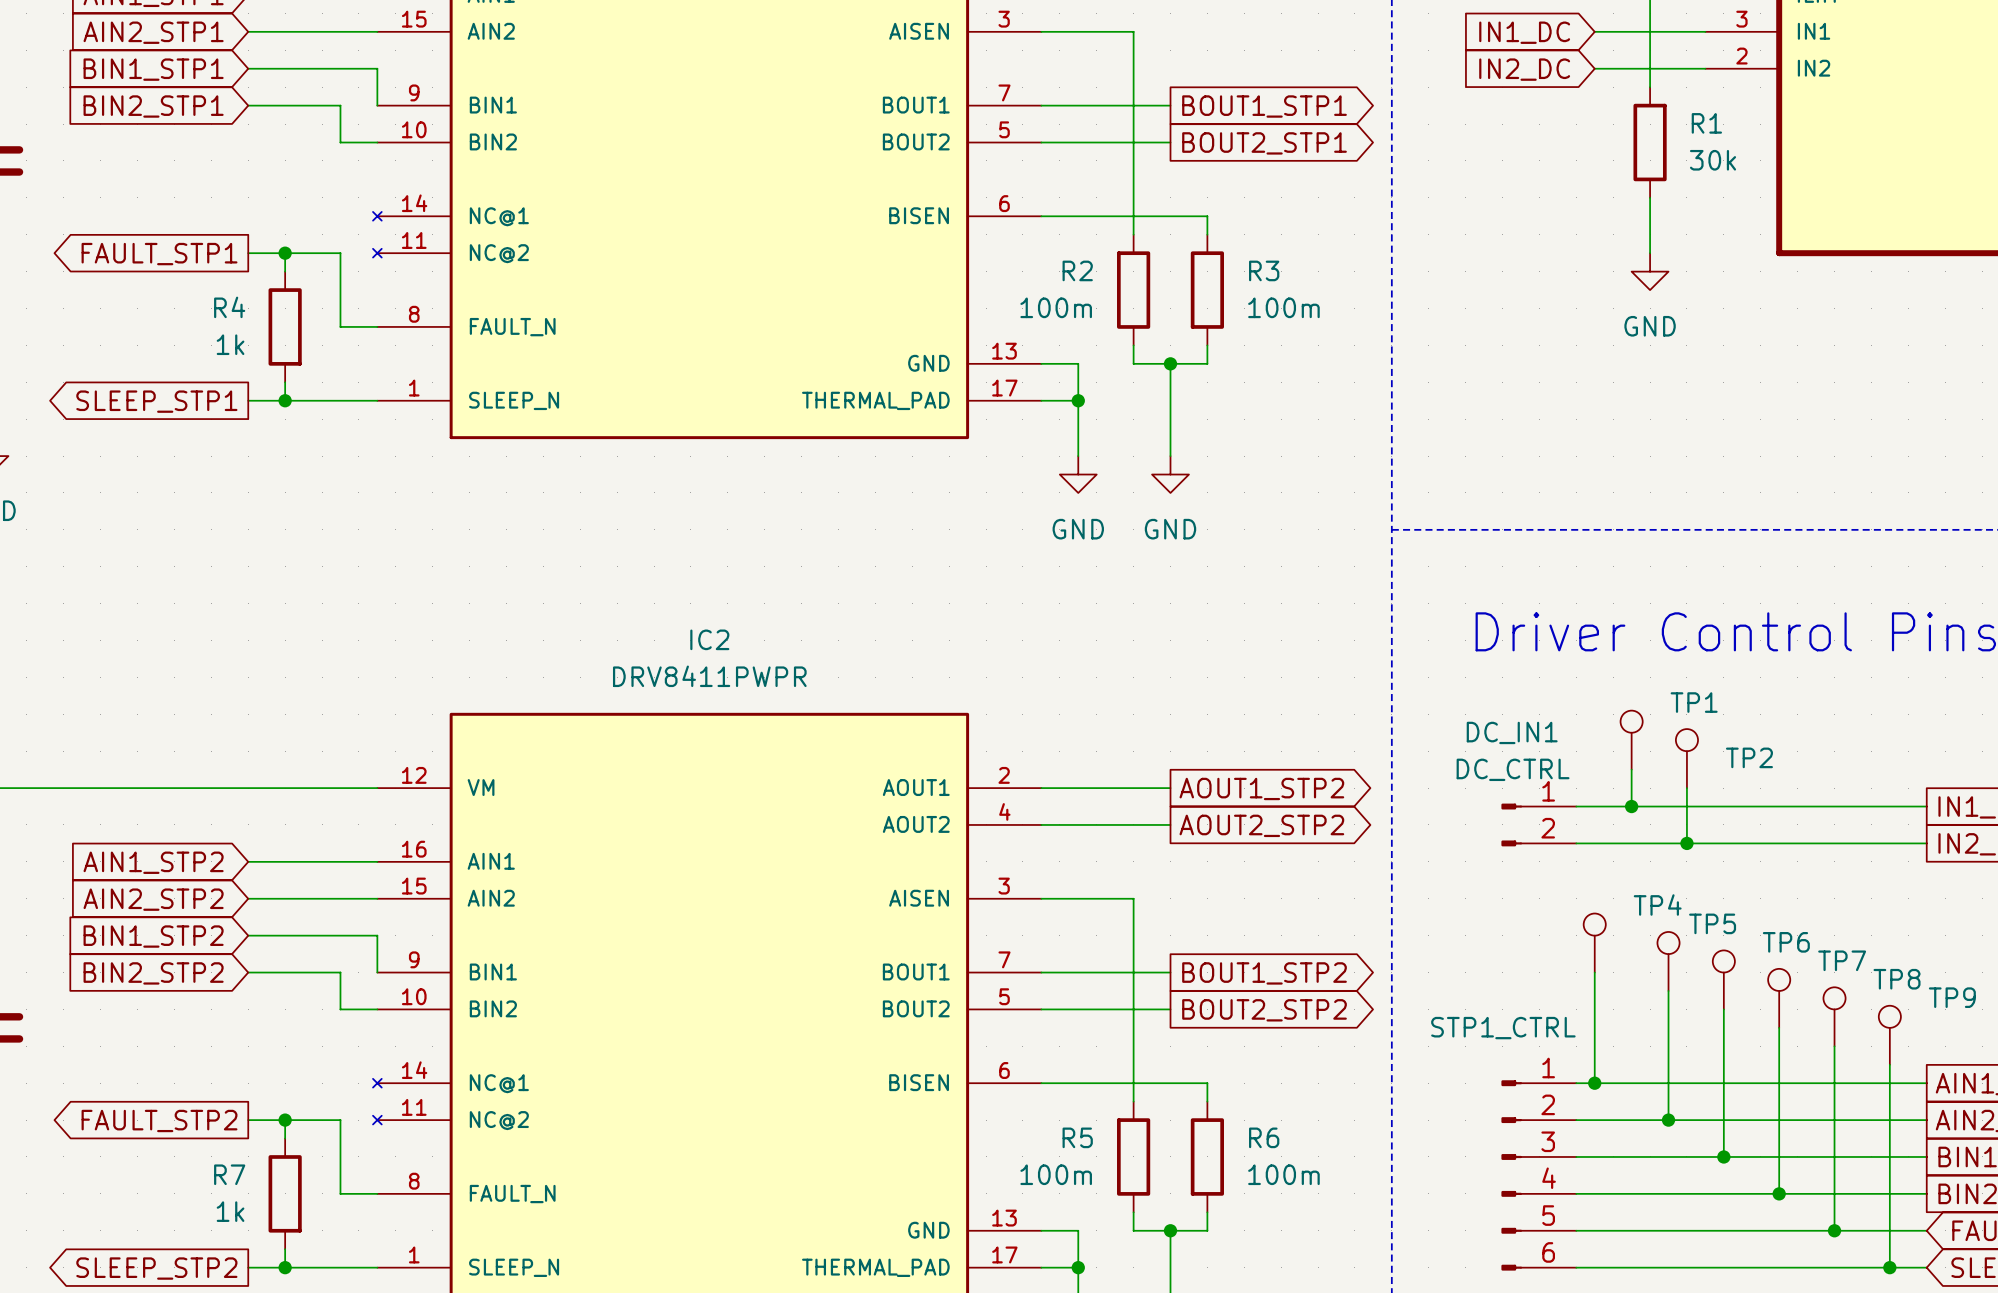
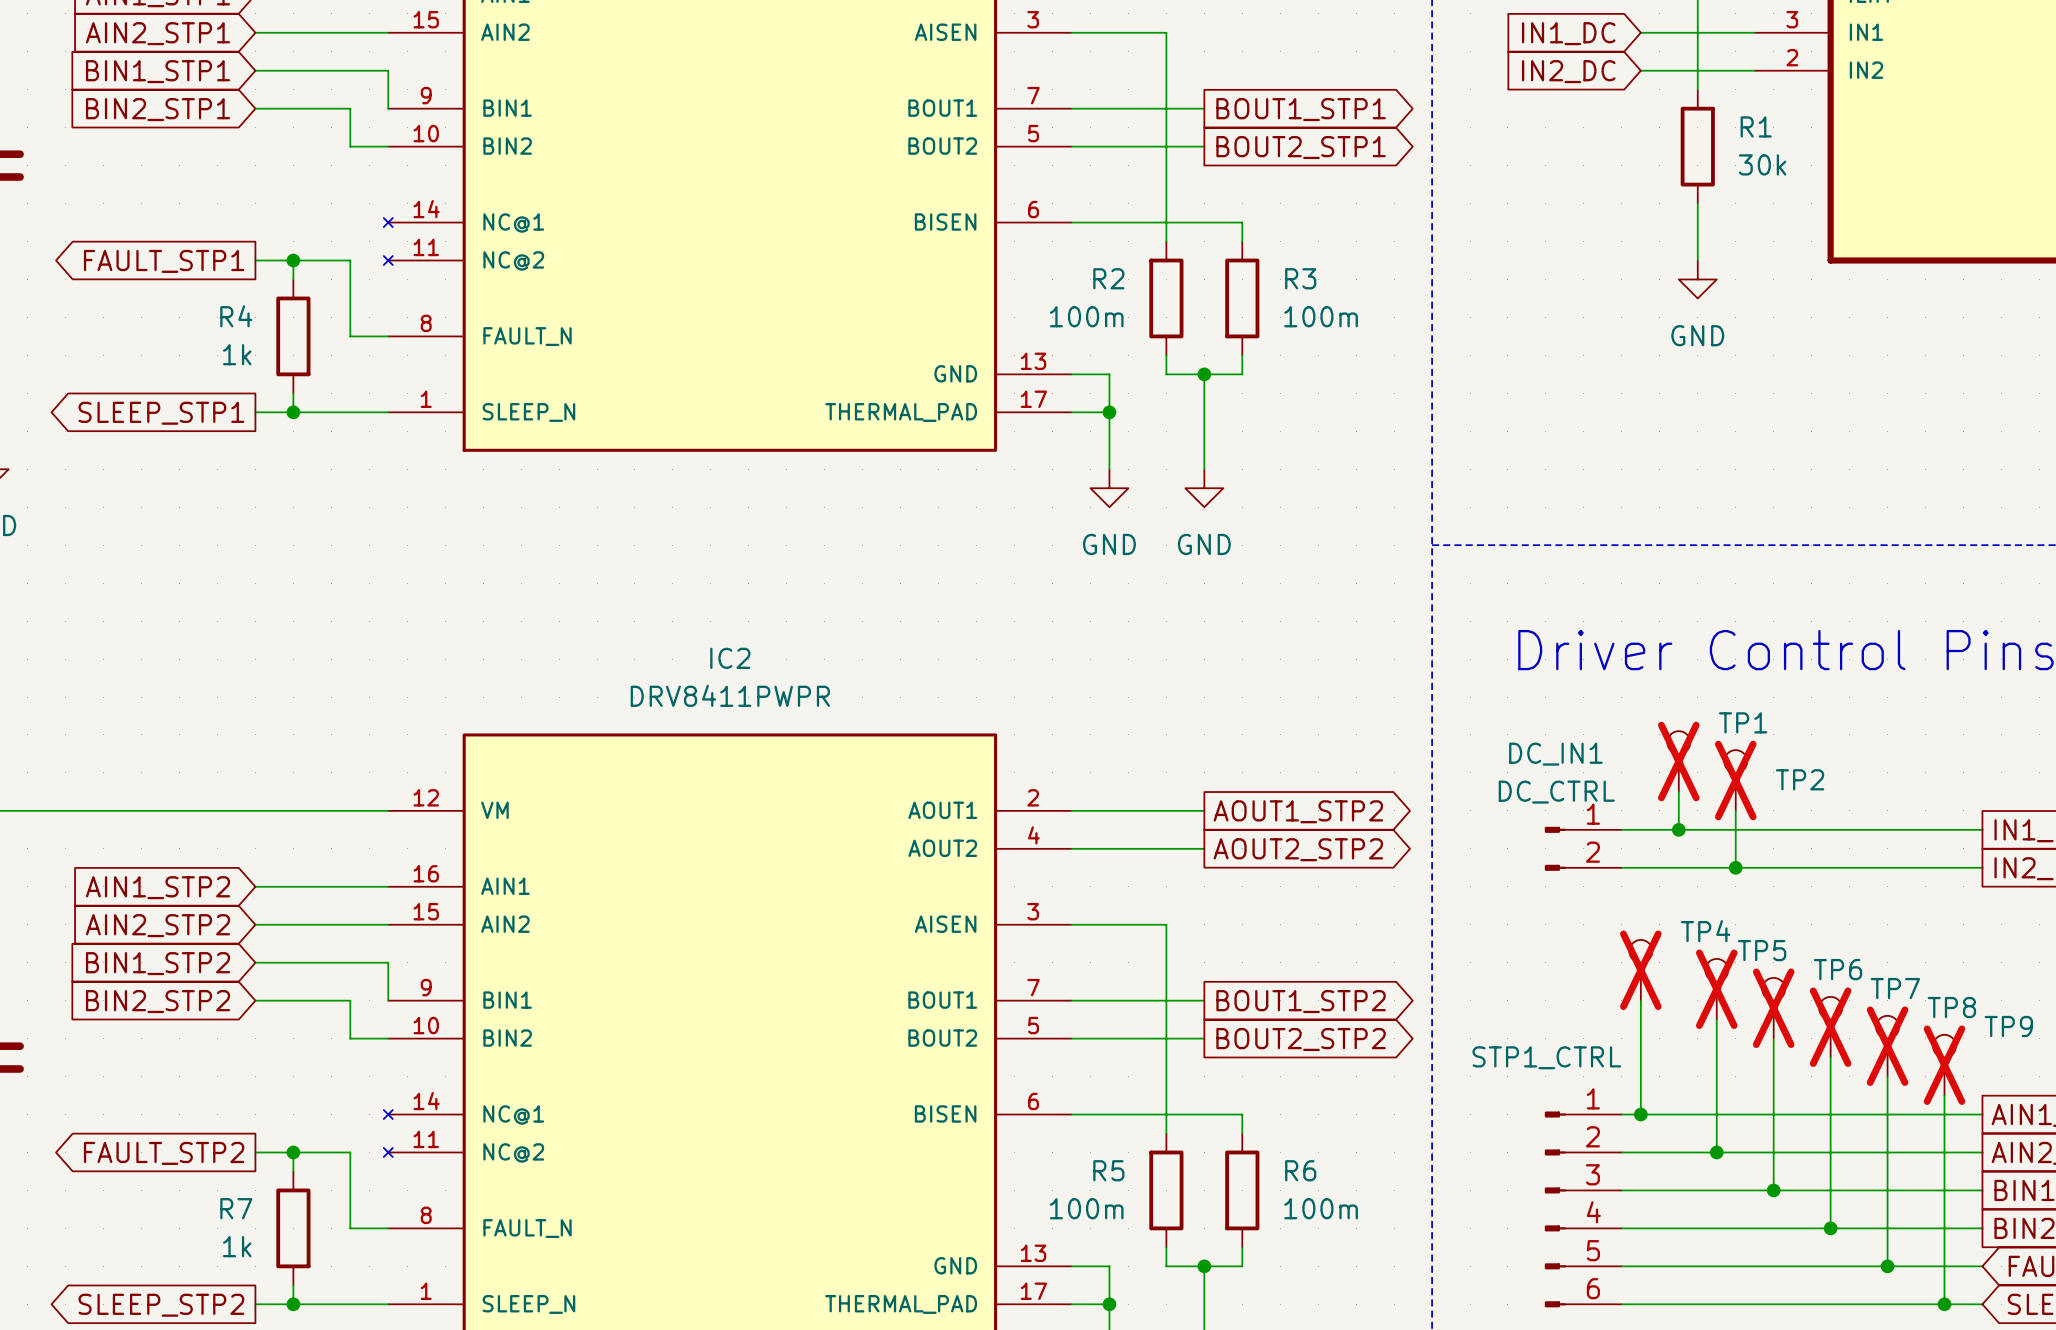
TP1 do-not-place cross: none -> (1678, 761)
TP2 do-not-place cross: none -> (1735, 780)
TP4 do-not-place cross: none -> (1640, 970)
TP5 do-not-place cross: none -> (1716, 989)
TP6 do-not-place cross: none -> (1773, 1008)
TP7 do-not-place cross: none -> (1830, 1027)
TP8 do-not-place cross: none -> (1887, 1046)
TP9 do-not-place cross: none -> (1944, 1065)

